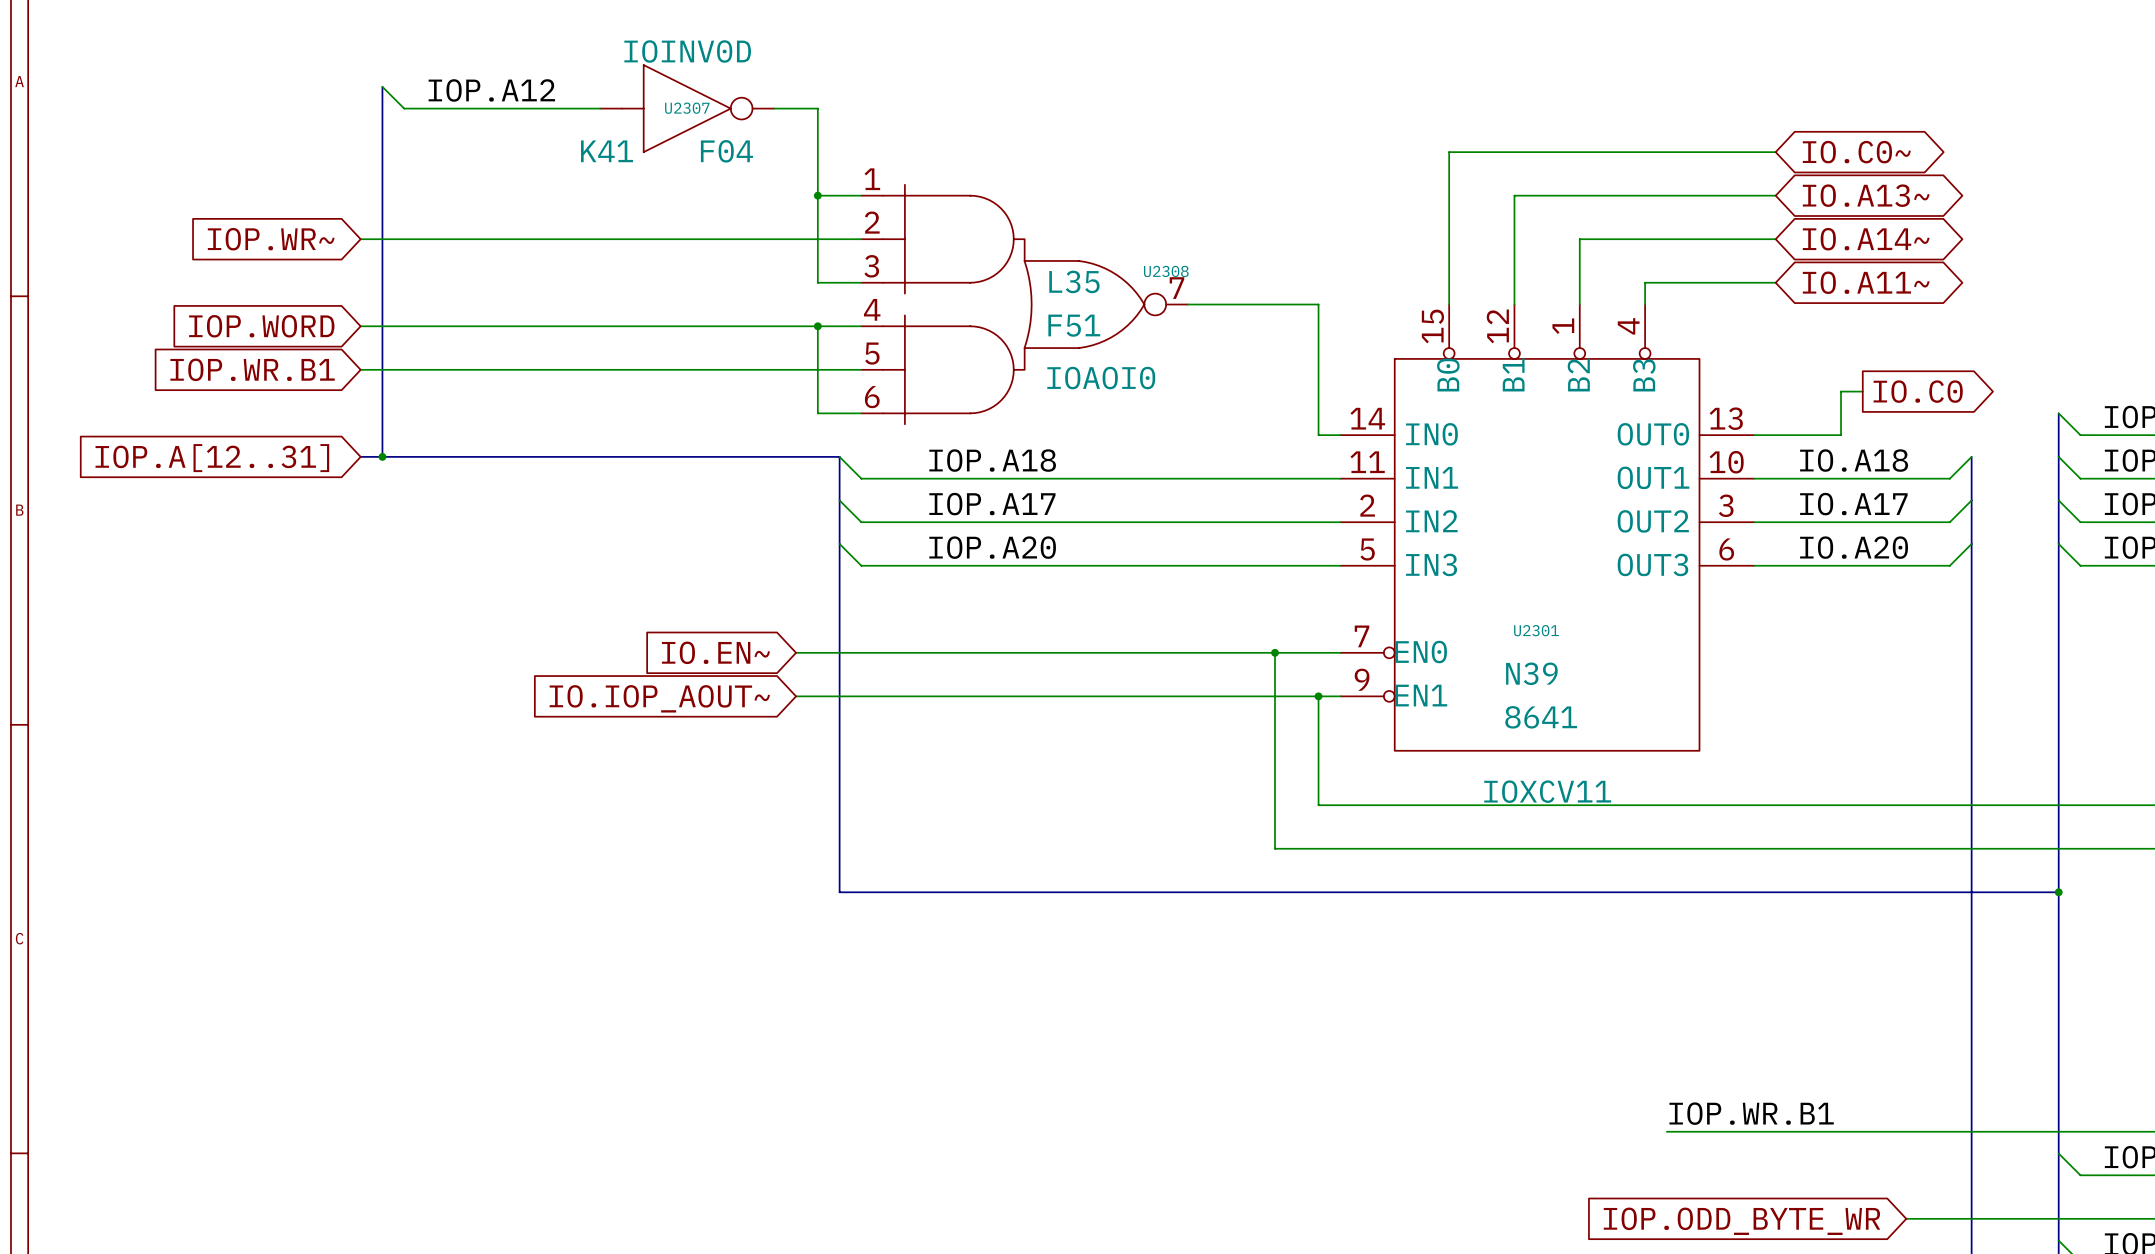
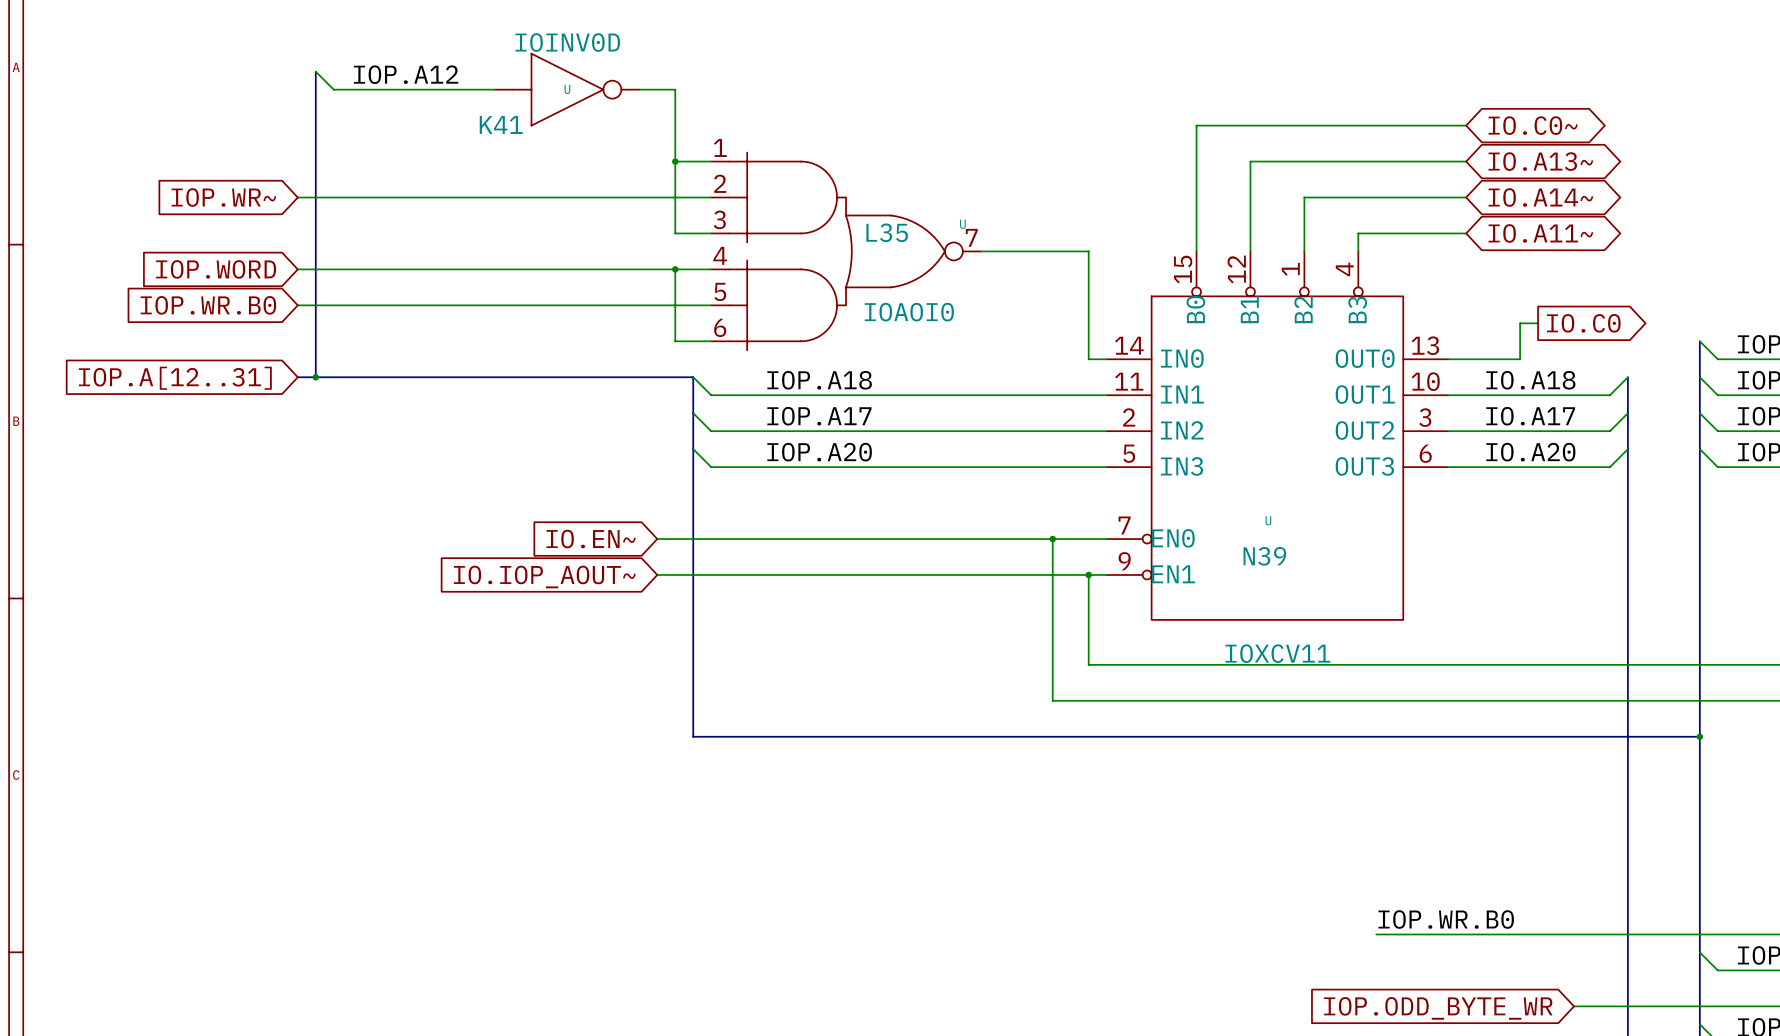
U2307 name: U2307 (687, 108) -> U (567, 89)
U2307 value: F04 (726, 151) -> none
U2308 name: U2308 (1166, 271) -> U (962, 224)
U2308 value: F51 (1074, 325) -> none
global label: IOP.WR.B1 (252, 369) -> IOP.WR.B0 (208, 305)
U2301 name: U2301 (1536, 630) -> U (1268, 520)
U2301 value: 8641 (1541, 717) -> none
label: IOP.WR.B1 (1751, 1113) -> IOP.WR.B0 (1446, 919)

